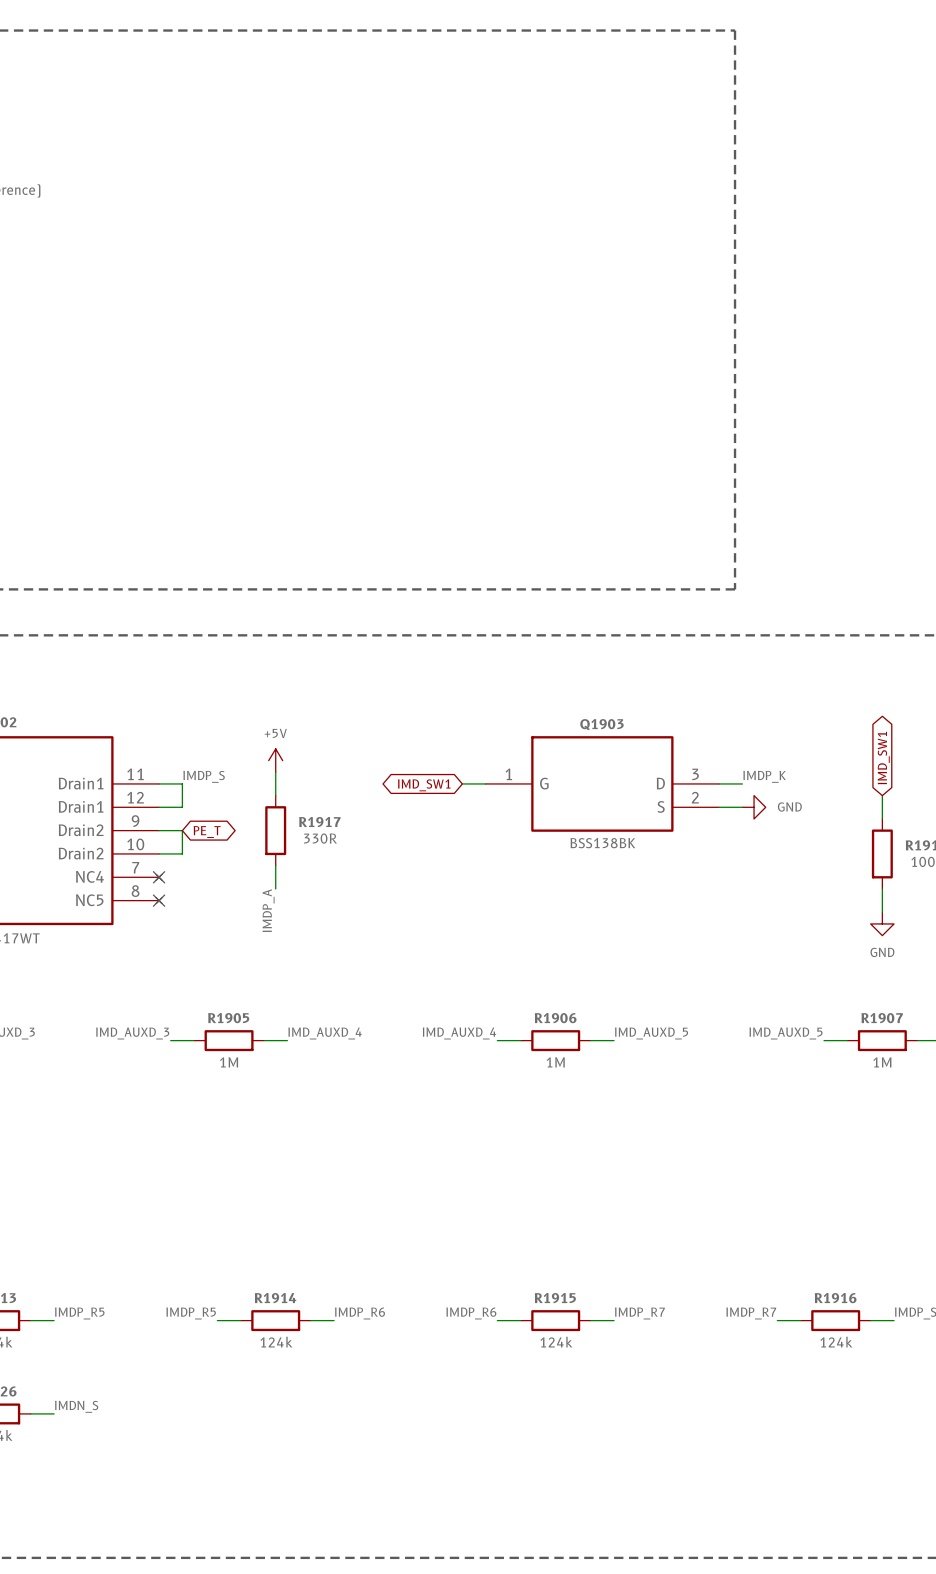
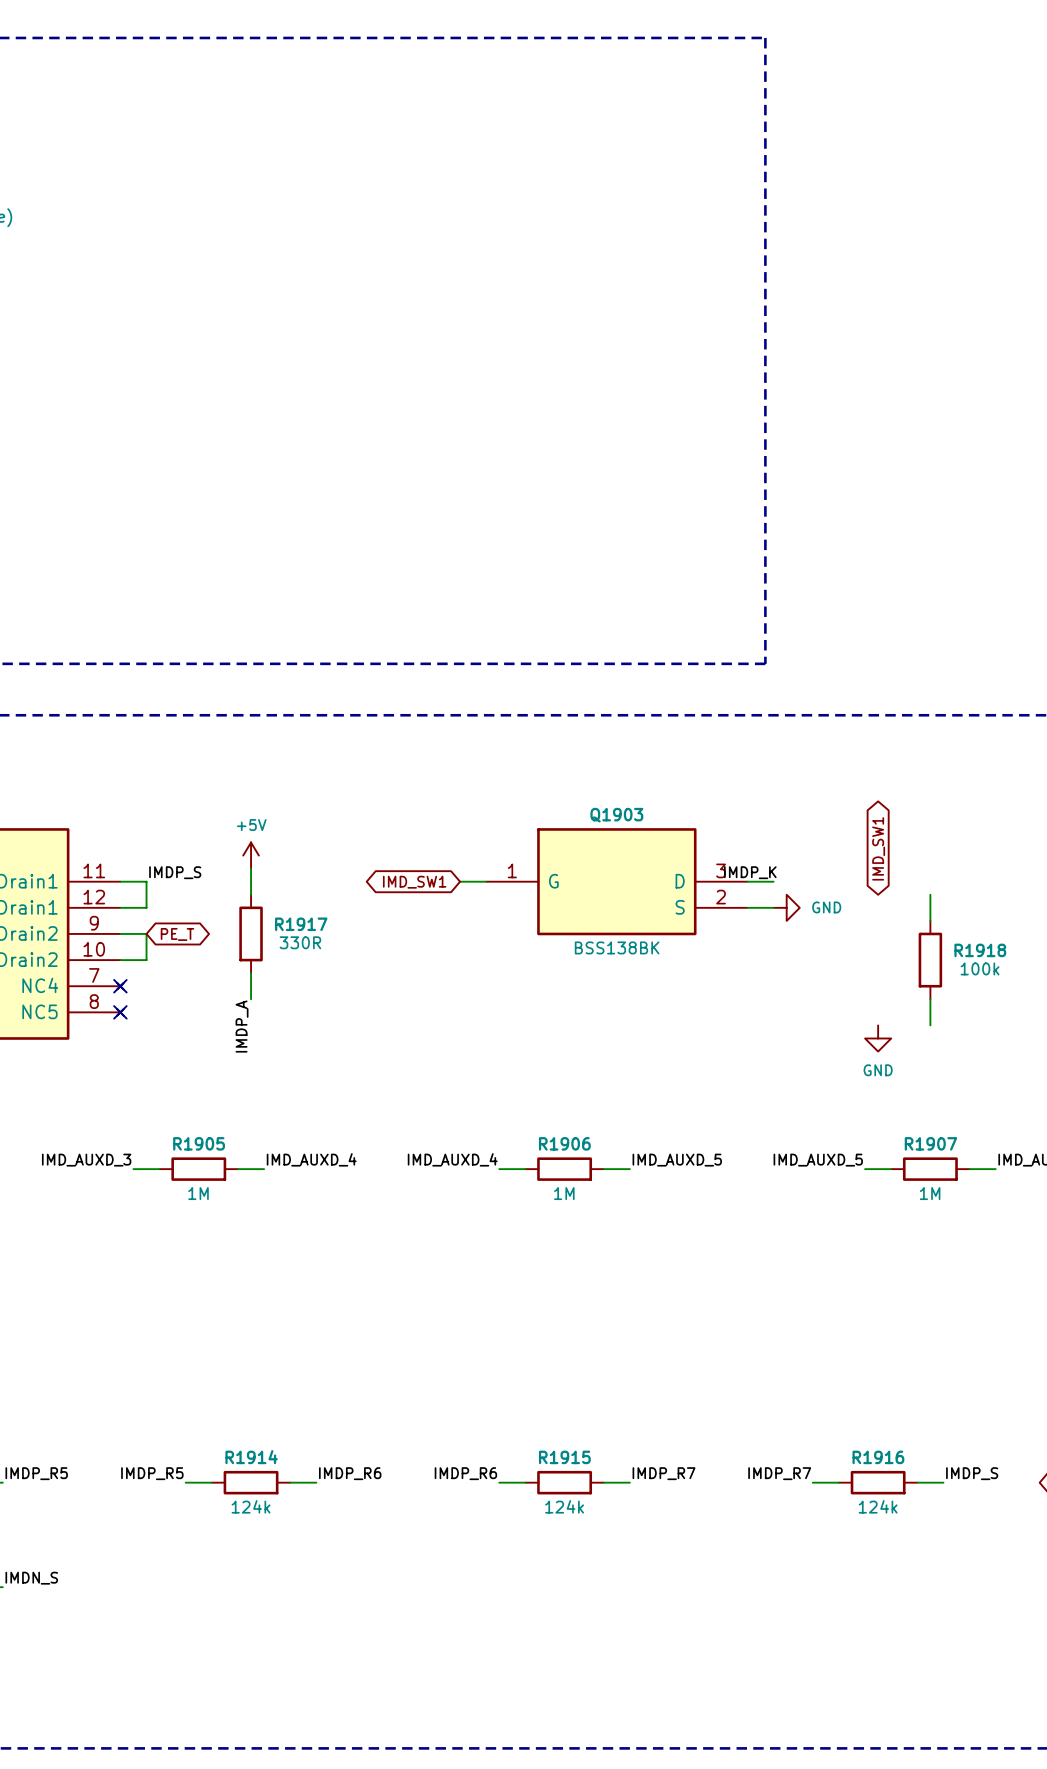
global label position: IMD_SW1 (883, 758) -> IMD_SW1 (878, 848)
label position: IMDP_K (764, 776) -> IMDP_K (750, 872)
power symbol position: GND (882, 923) -> GND (878, 1038)

